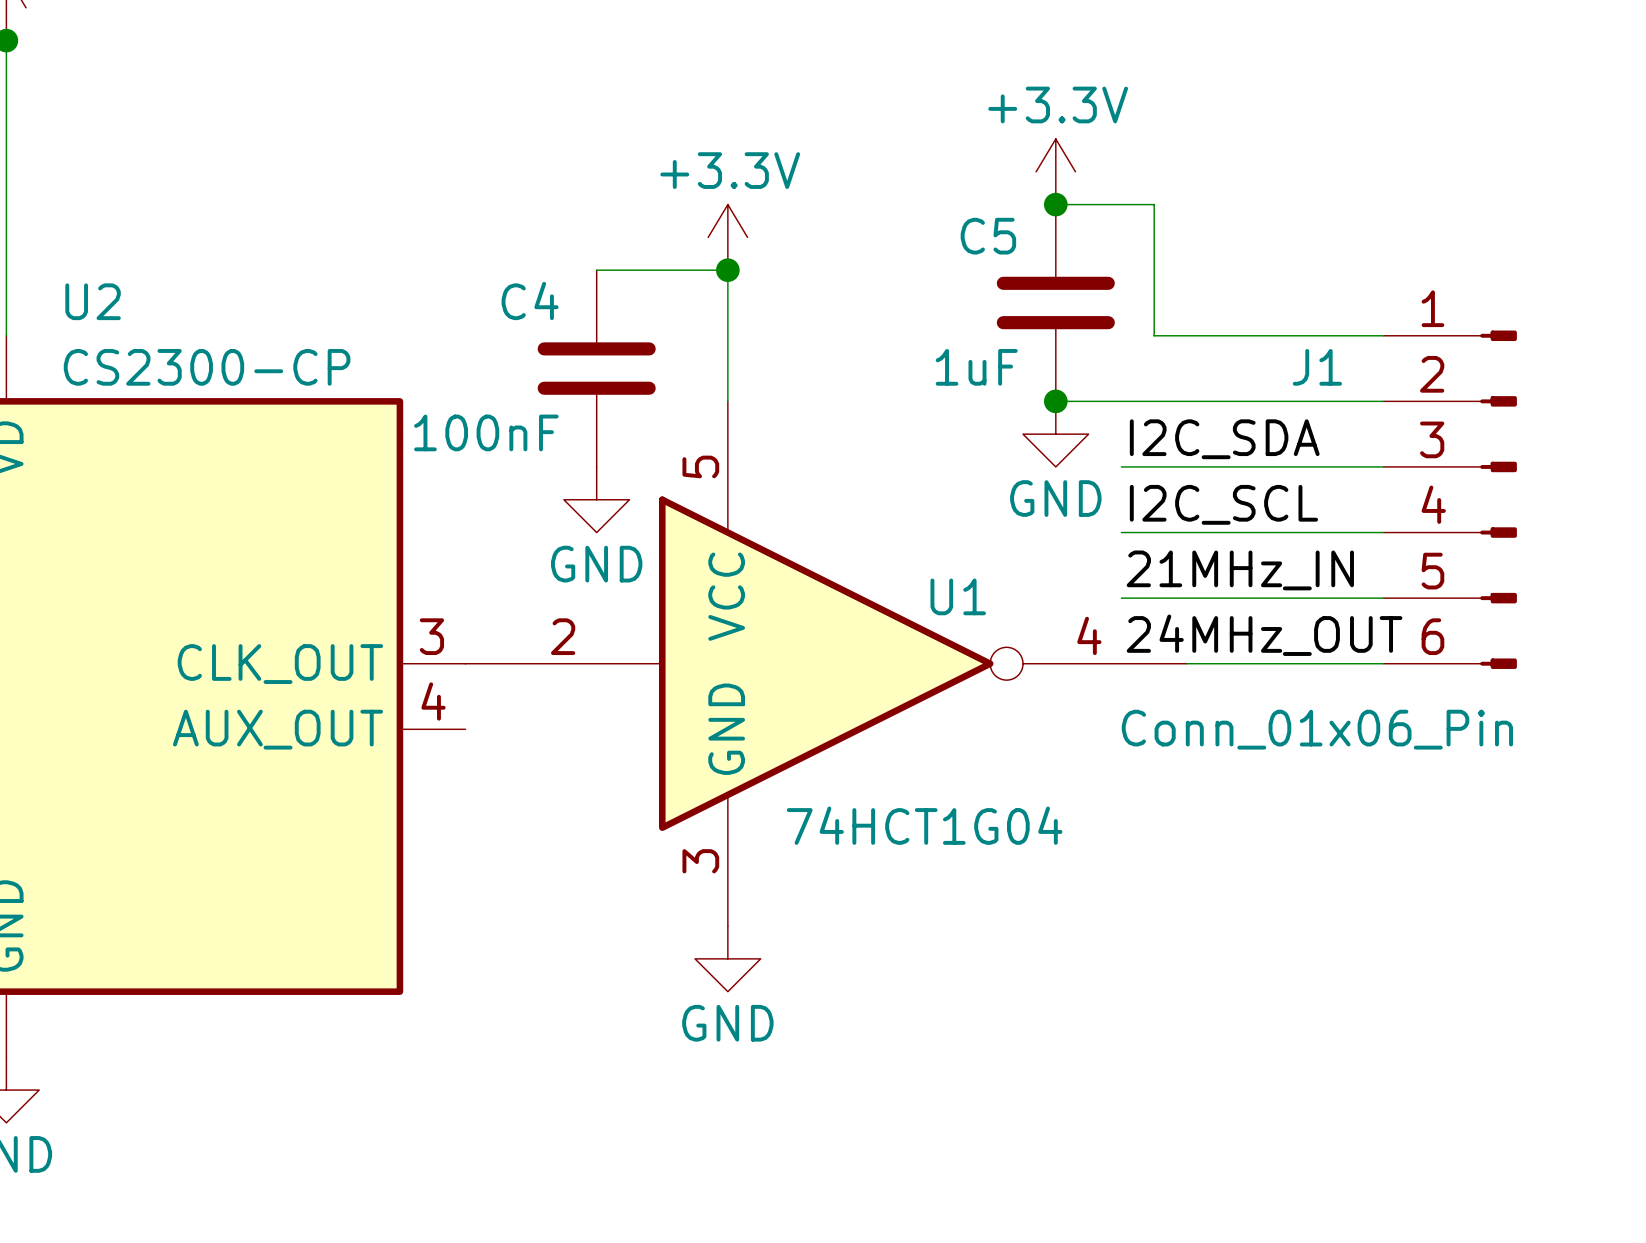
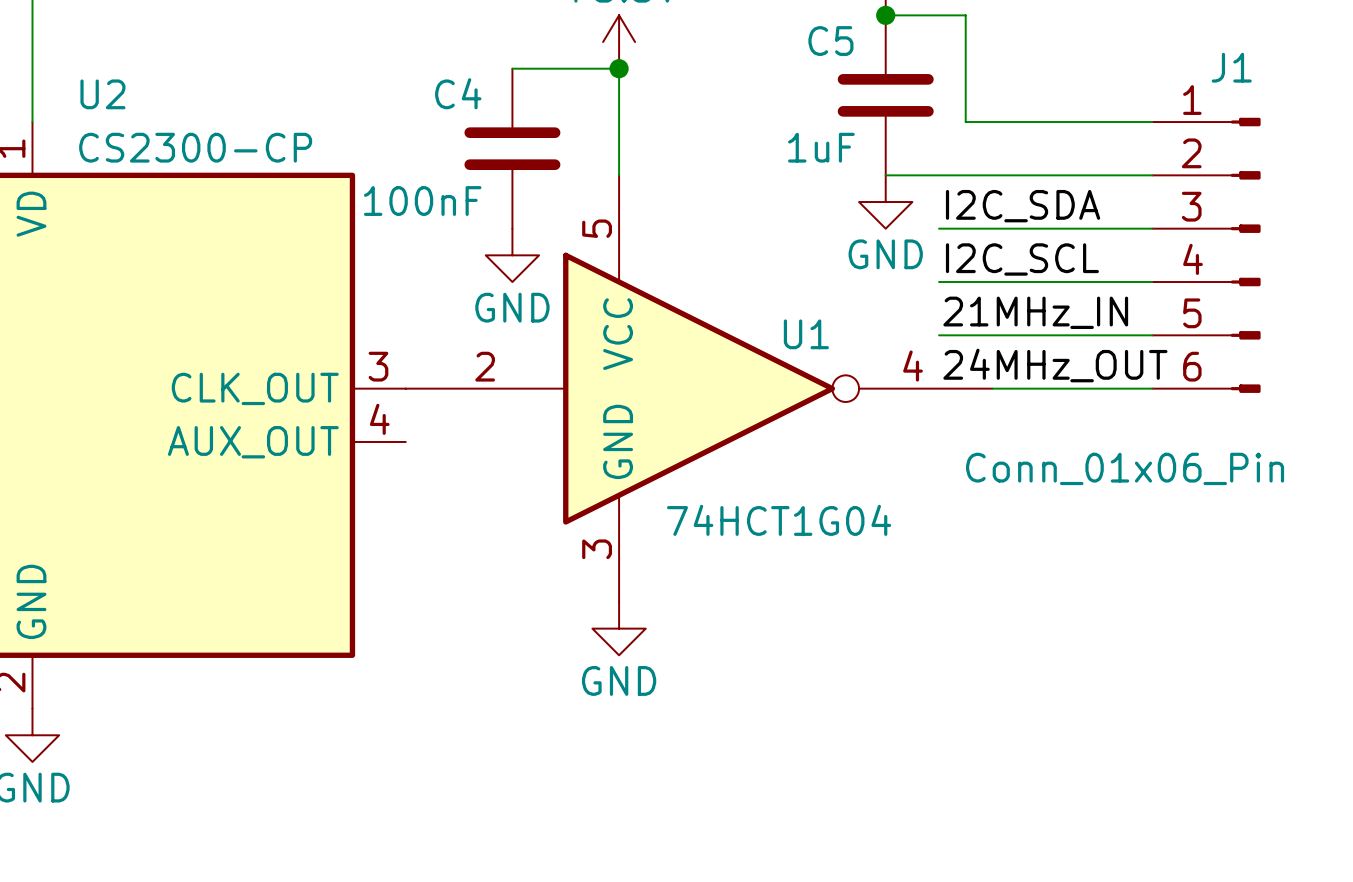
J1 name position: J1 (1317, 367) -> J1 (1231, 67)
junction: (1055, 401) -> none
J1 value position: Conn_01x06_Pin (1317, 729) -> Conn_01x06_Pin (1125, 468)

